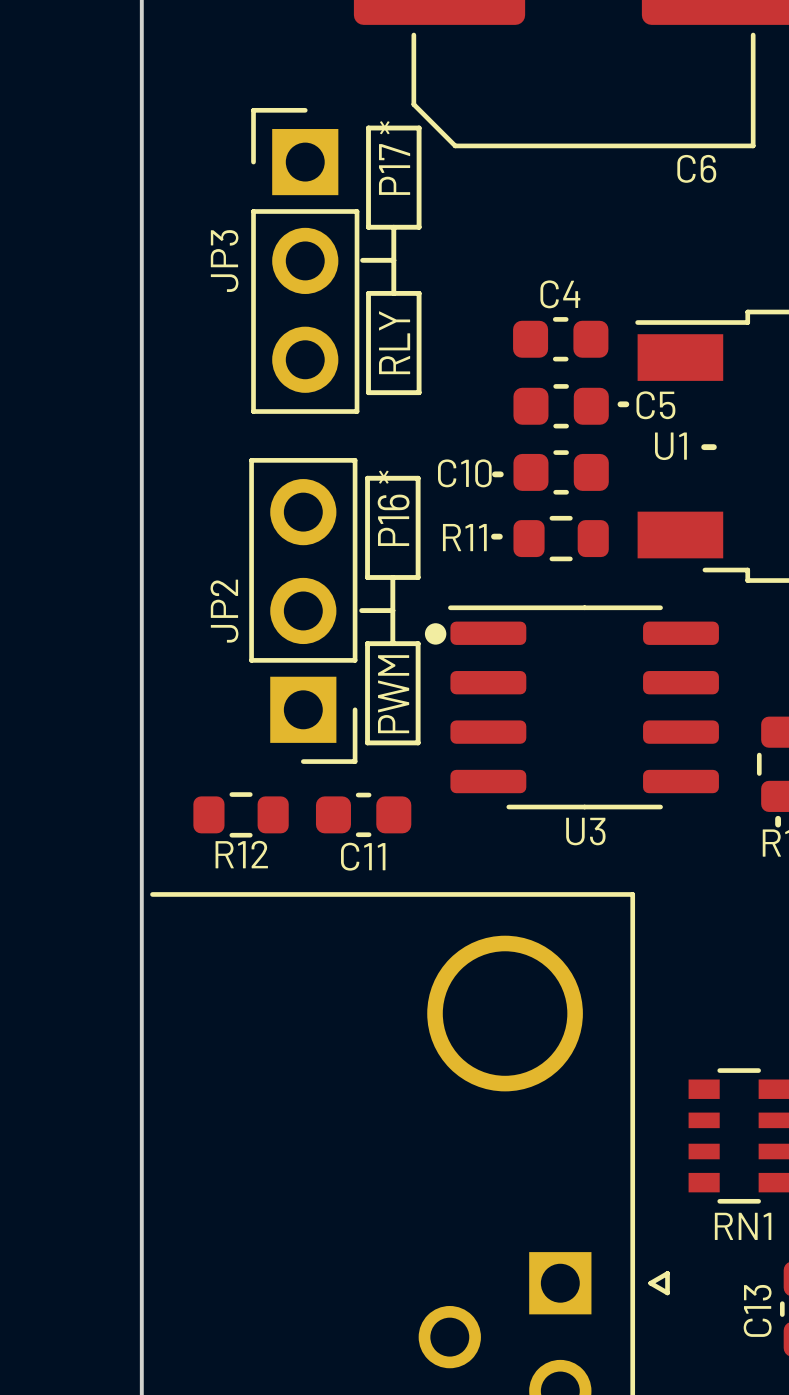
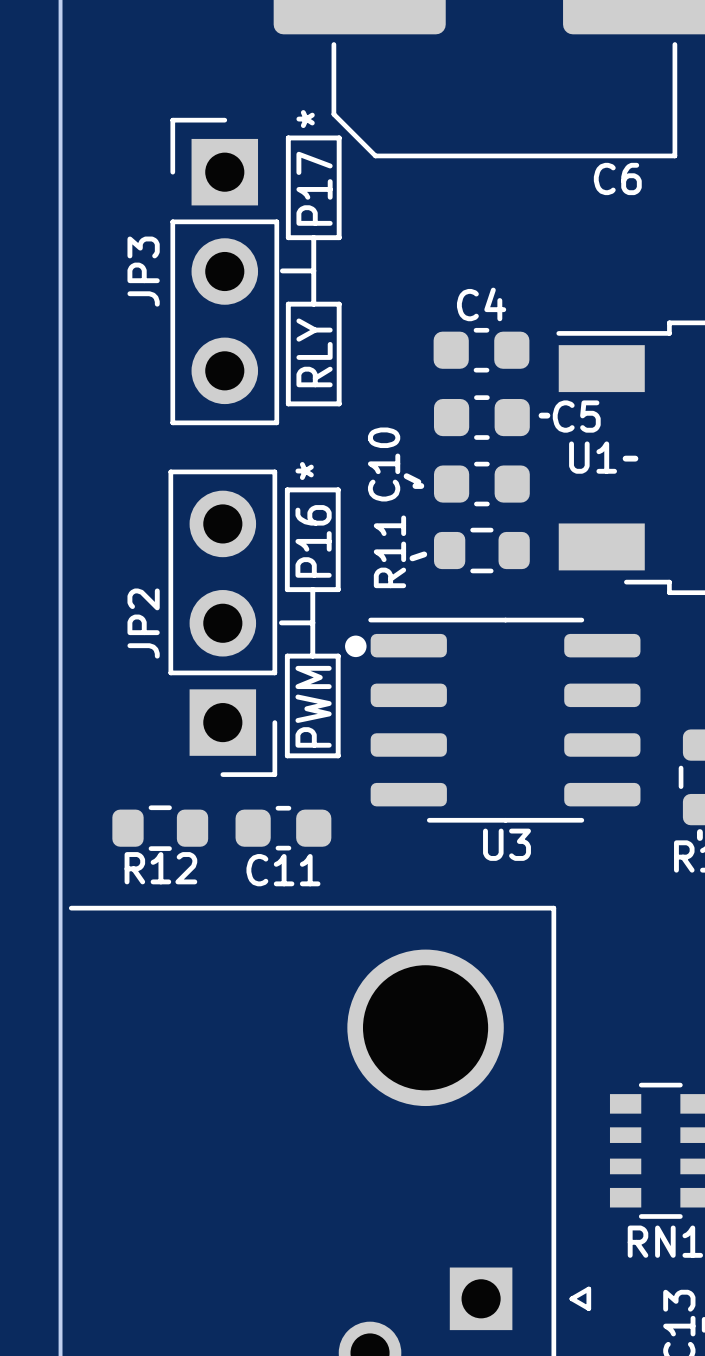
line: none -> (406, 476) (418, 482)
C10 name rotation: 0° (464, 473) -> 90° counterclockwise (384, 464)
line: (494, 536) (499, 536) -> none
R11 name rotation: 0° (464, 537) -> 90° counterclockwise (389, 551)
line: none -> (424, 554) (412, 558)

